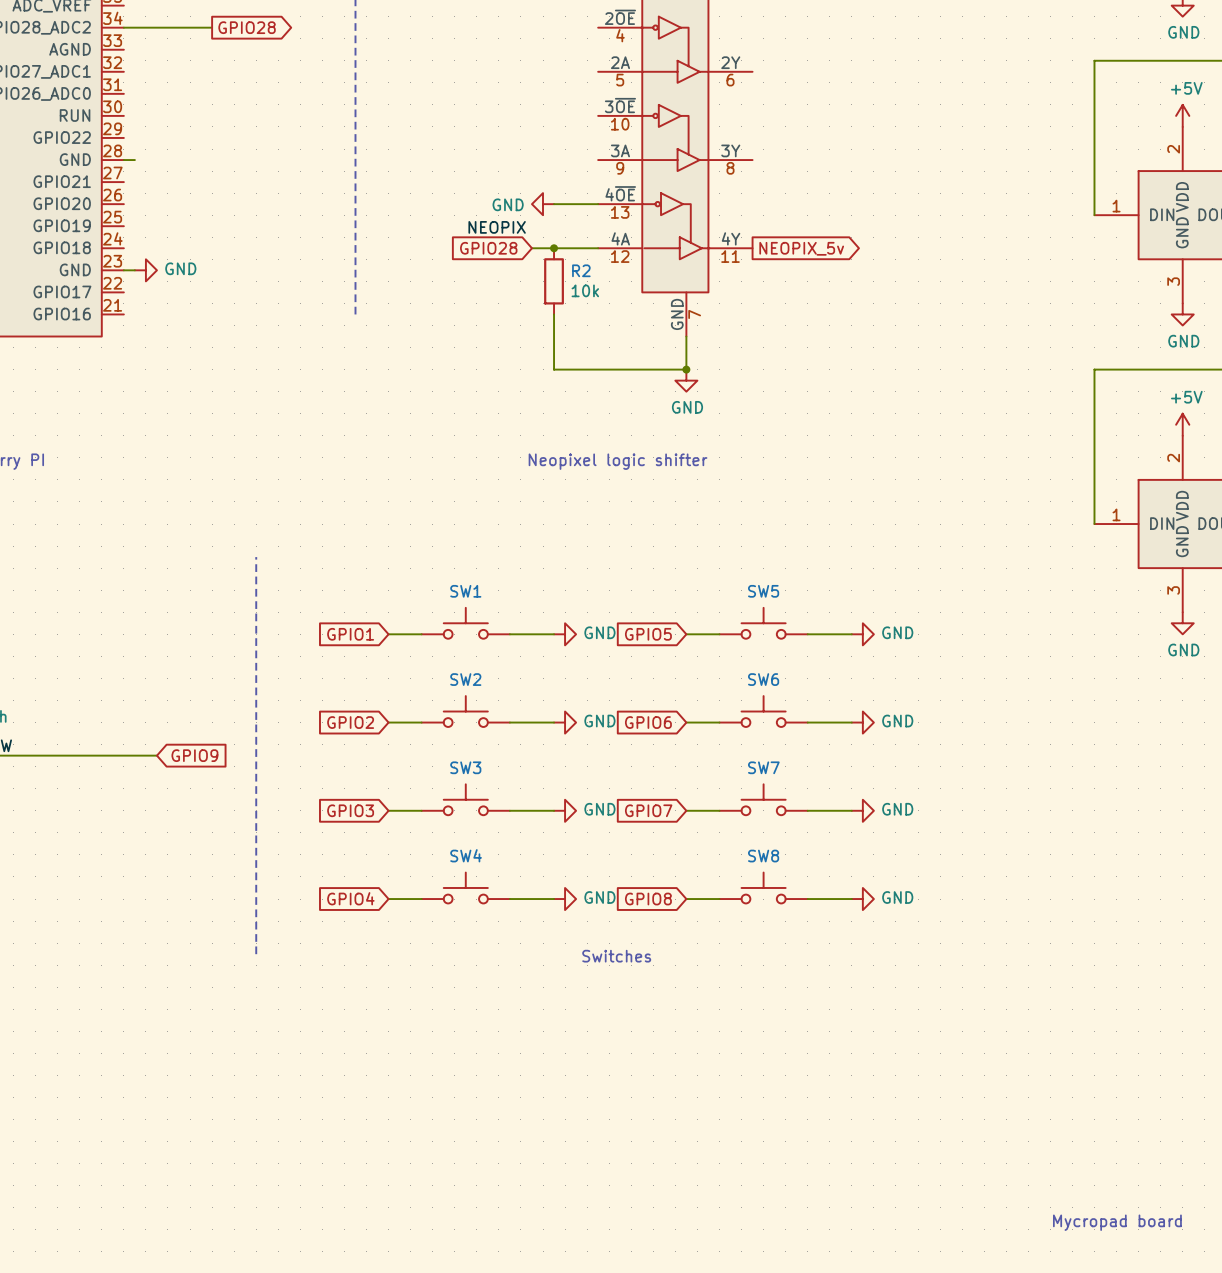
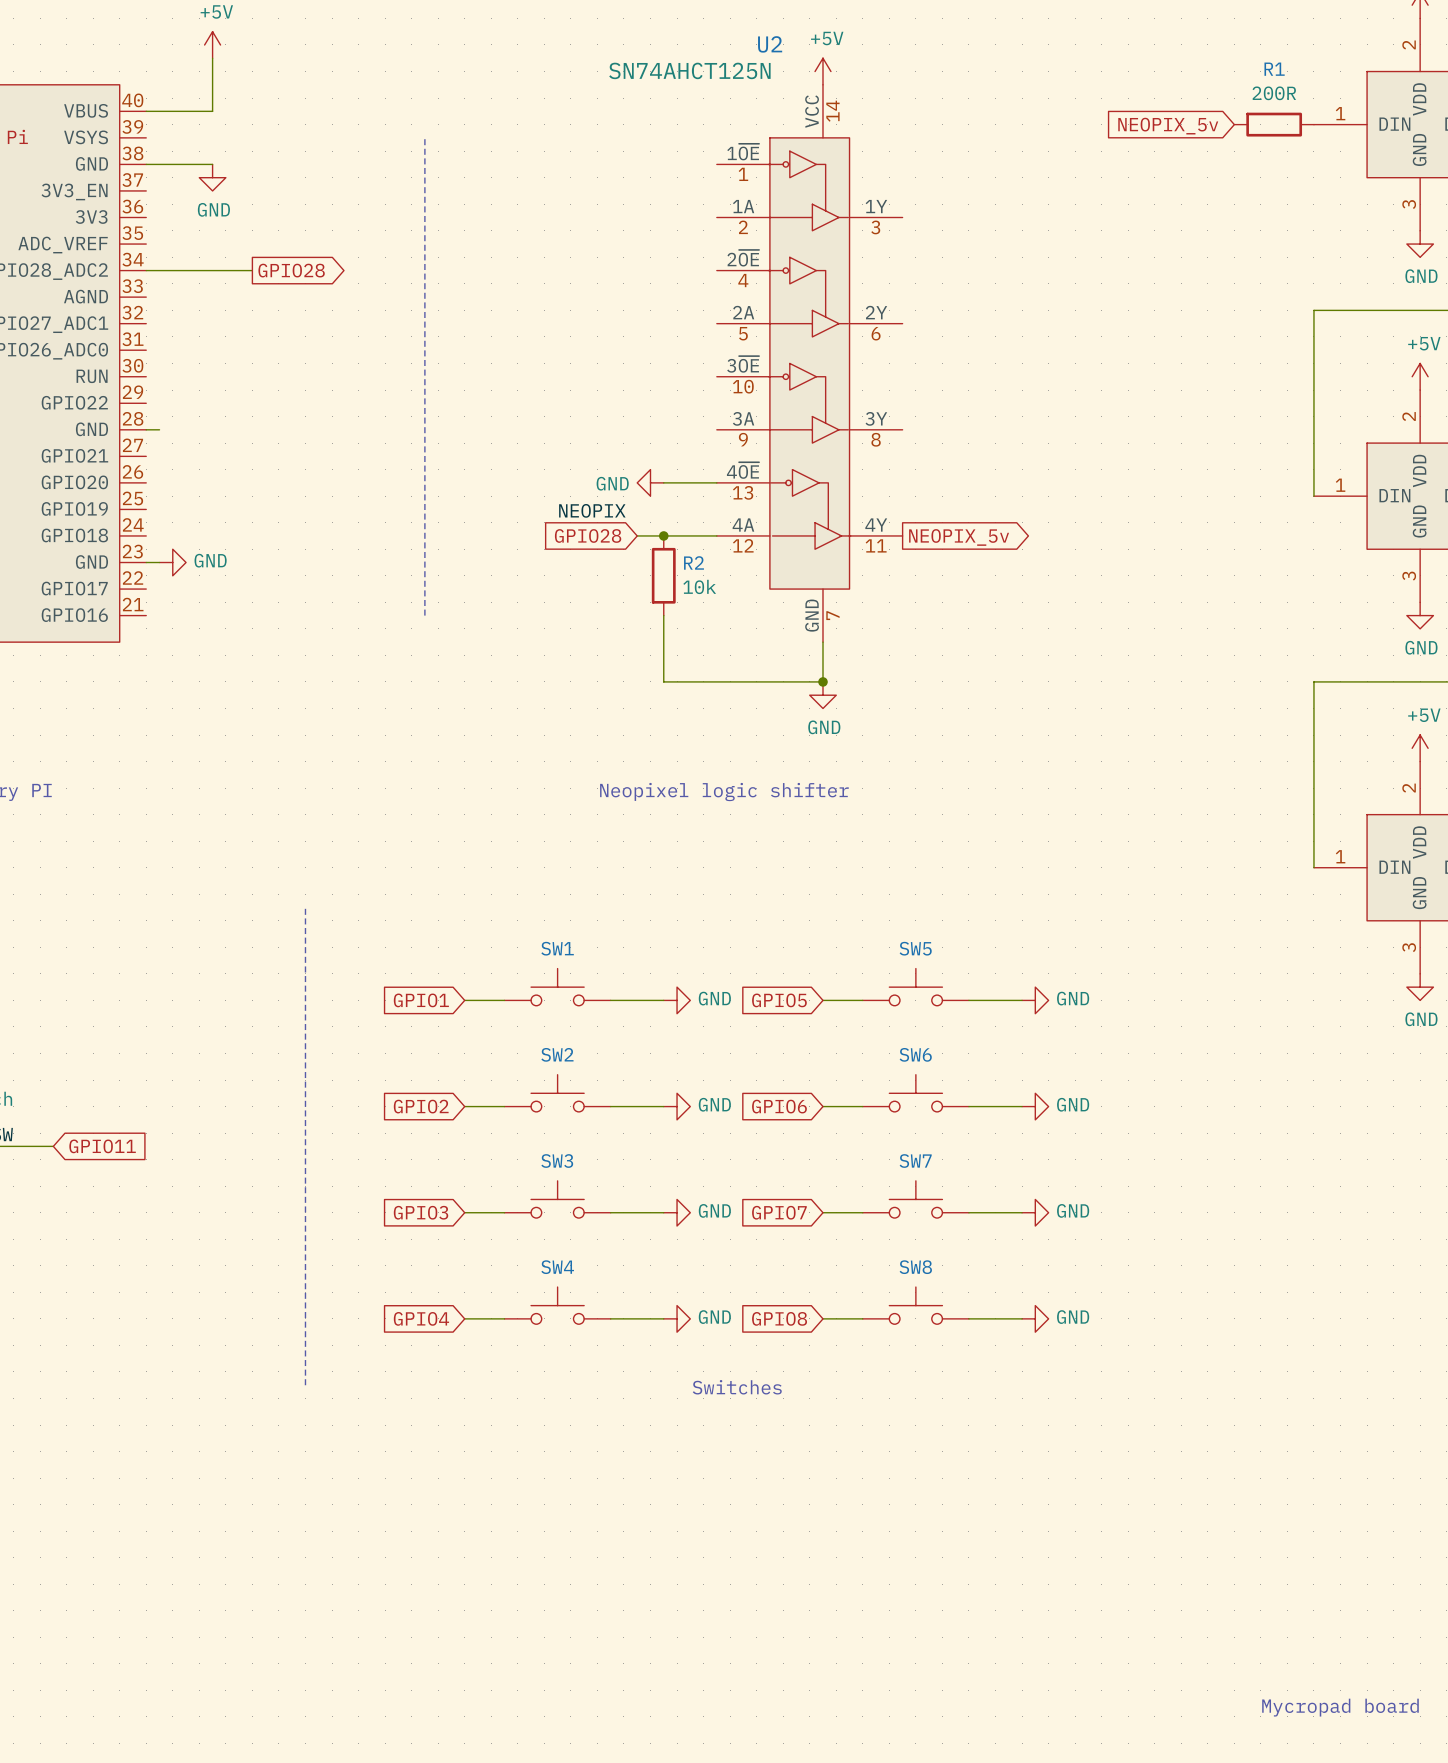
wire: (46, 755) (156, 755) -> none
global label: none -> GPIO11 (102, 1146)
global label: GPIO9 (194, 755) -> none

